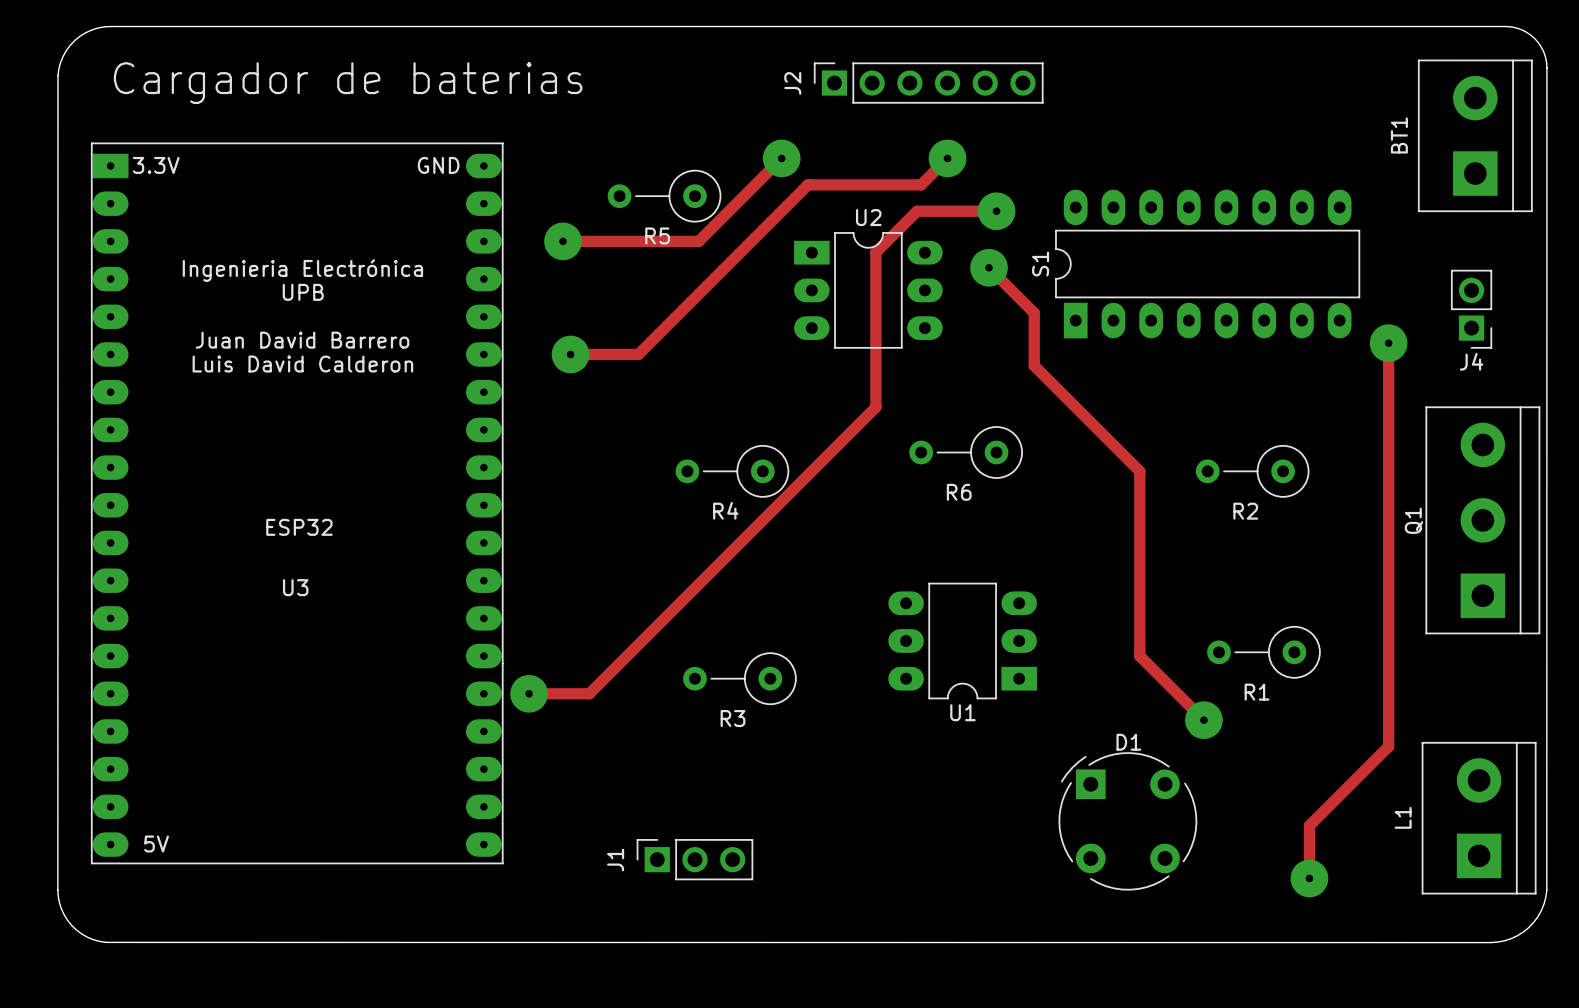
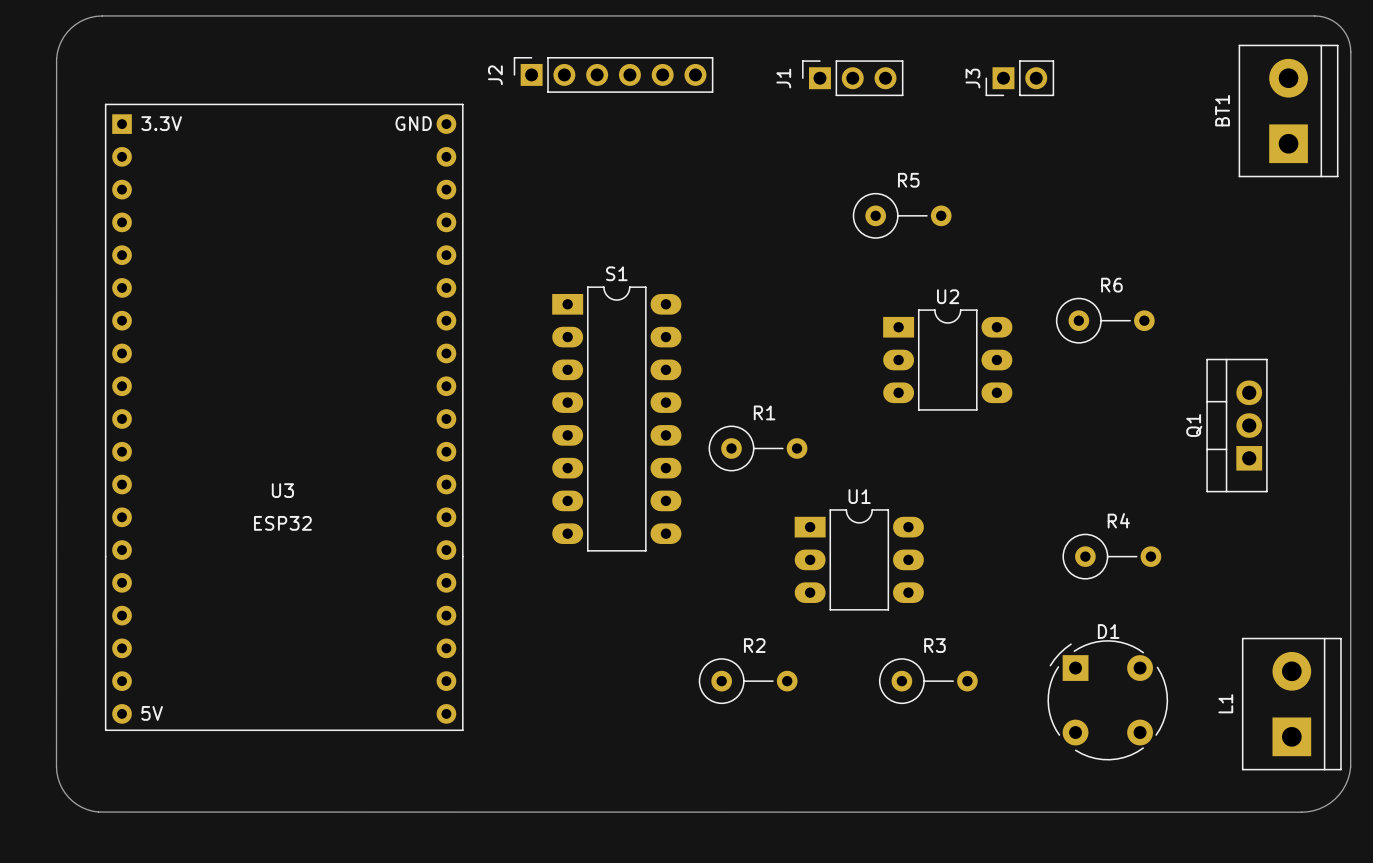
text: Cargador de baterias (348, 83) -> none
J2 position: (928, 83) -> (613, 74)
J3: none -> (1019, 78)
U3 footprint: [90, 142, 504, 865] -> [104, 103, 464, 732]
track: (781, 158) (698, 241) (563, 241) -> none
via: (781, 158) -> none
track: (947, 158) (921, 184) (808, 184) (638, 354) (570, 354) -> none
via: (947, 158) -> none
R5 rotation: 0° (664, 196) -> 180° (902, 215)
R5 position: (664, 196) -> (902, 215)
track: (996, 211) (917, 211) (875, 252) (875, 407) (589, 693) (529, 693) -> none
via: (996, 211) -> none
via: (563, 241) -> none
S1 rotation: 0° (1207, 264) -> 90° clockwise (616, 418)
S1 position: (1207, 264) -> (616, 418)
track: (989, 267) (1034, 313) (1034, 365) (1139, 471) (1139, 656) (1203, 720) -> none
via: (989, 267) -> none
text: Ingenieria Electrónica (302, 270) -> none
U2 position: (868, 290) -> (947, 360)
text: UPB (303, 292) -> none
J4: (1471, 309) -> none
text: Juan David Barrero (302, 340) -> none
track: (1388, 343) (1388, 746) (1309, 825) (1309, 878) -> none
via: (1388, 343) -> none
via: (570, 354) -> none
text: Luis David Calderon (302, 364) -> none
Q1 footprint: [1425, 406, 1541, 635] -> [1206, 358, 1268, 493]
R6 rotation: 0° (966, 452) -> 180° (1105, 320)
R6 position: (966, 452) -> (1105, 320)
R4 rotation: 0° (732, 471) -> 180° (1111, 556)
R4 position: (732, 471) -> (1111, 556)
R2 rotation: 0° (1252, 471) -> 180° (748, 681)
R2 position: (1252, 471) -> (748, 681)
U1 rotation: 0° (962, 641) -> 180° (859, 559)
R1 rotation: 0° (1263, 652) -> 180° (757, 448)
R1 position: (1263, 652) -> (757, 448)
R3 rotation: 0° (739, 678) -> 180° (928, 681)
R3 position: (739, 678) -> (928, 681)
via: (529, 693) -> none
via: (1203, 720) -> none
D1 position: (1127, 821) -> (1107, 700)
J1 position: (694, 859) -> (852, 78)
via: (1309, 878) -> none

